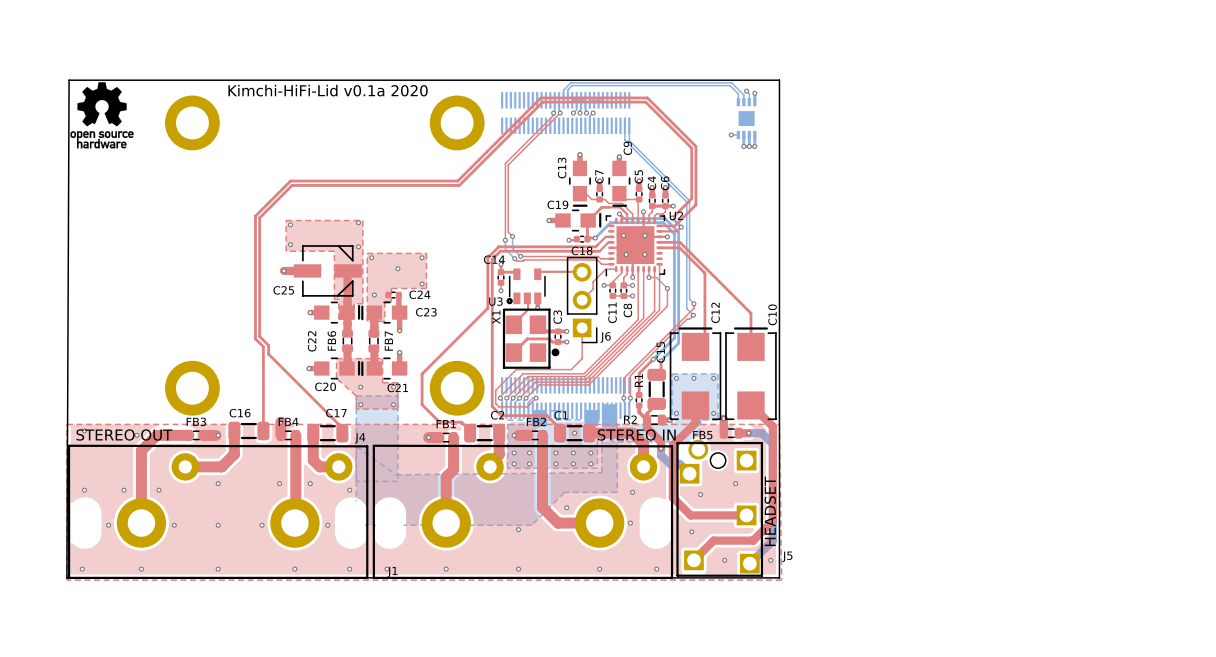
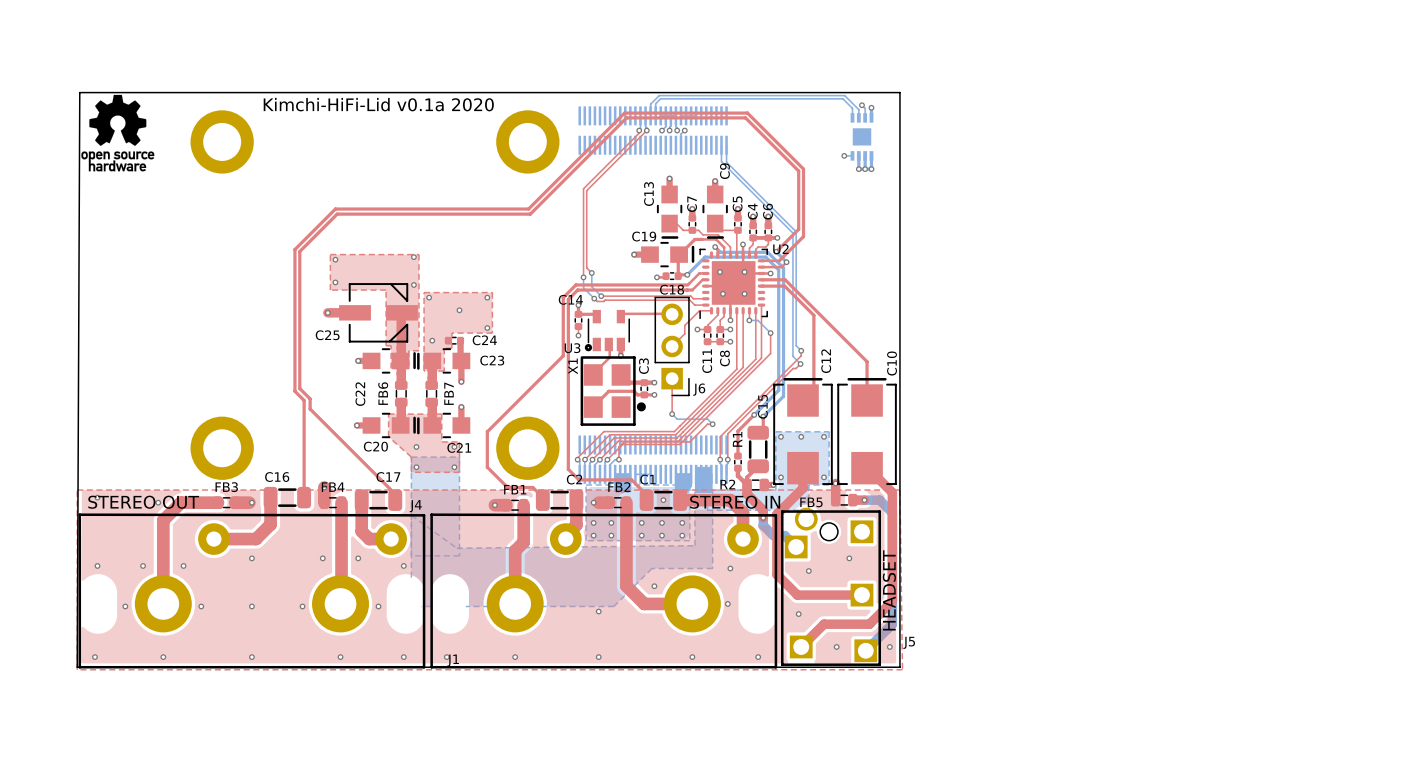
bottom track: none -> (672, 414) (677, 419) (707, 419) (712, 424)
top track: (582, 358) (571, 369) (516, 369) (495, 390) (495, 403) (498, 406) (527, 406) (536, 398) -> (712, 424) (707, 424) (689, 441) (624, 441) (618, 446) (618, 459)
via: none -> (672, 414)
via: none -> (712, 424)

